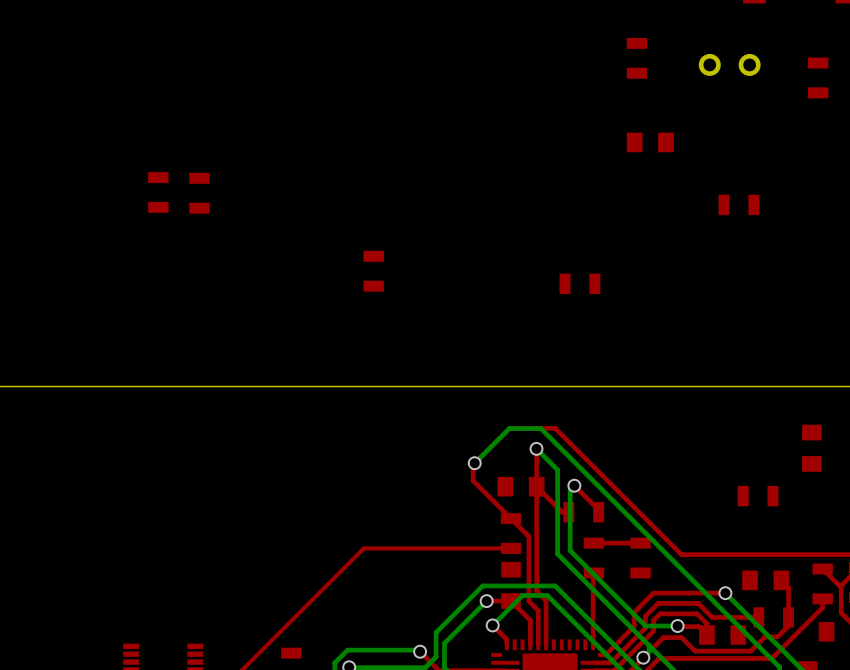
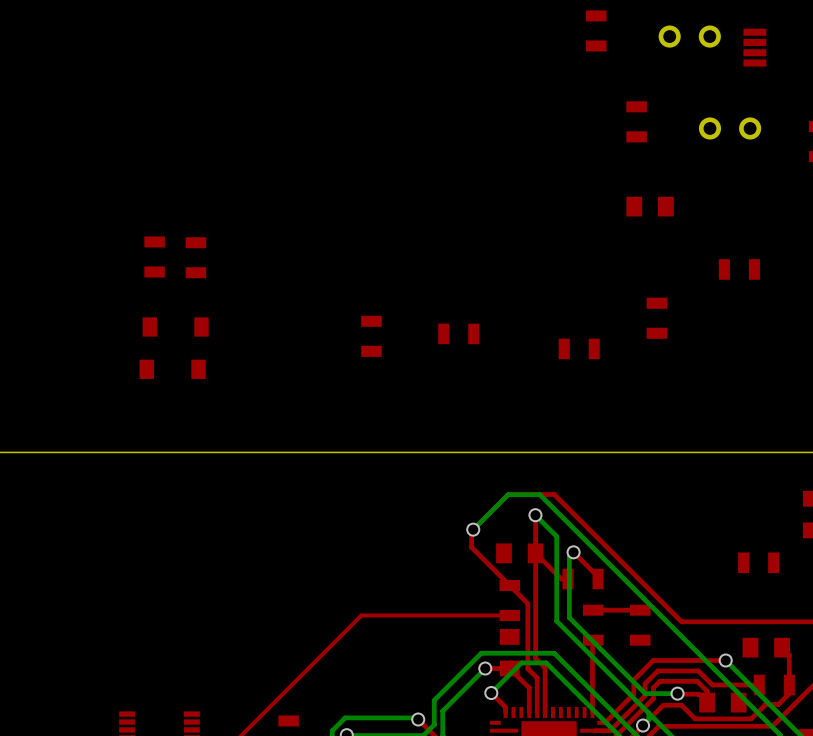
part: none -> (656, 318)
part: none -> (175, 326)
part: none -> (458, 333)
part: none -> (172, 369)

